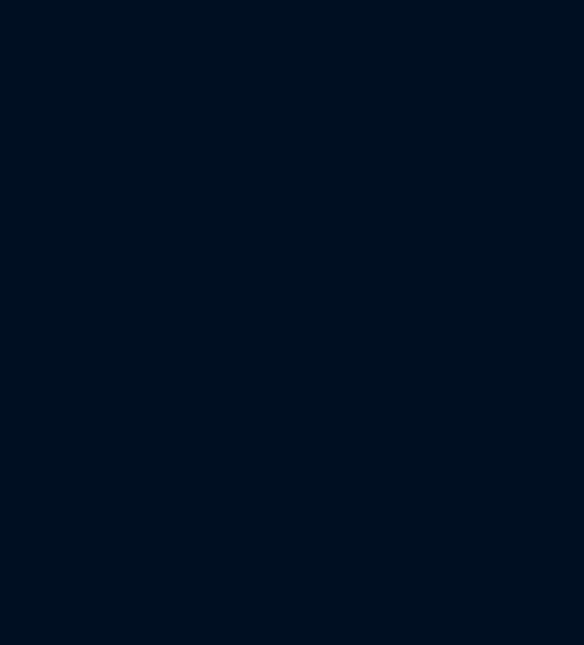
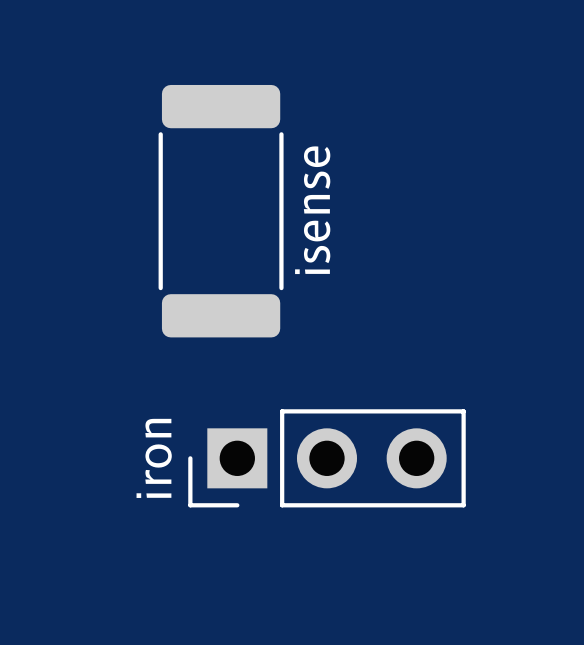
isense: none -> (221, 211)
iron: none -> (326, 458)

